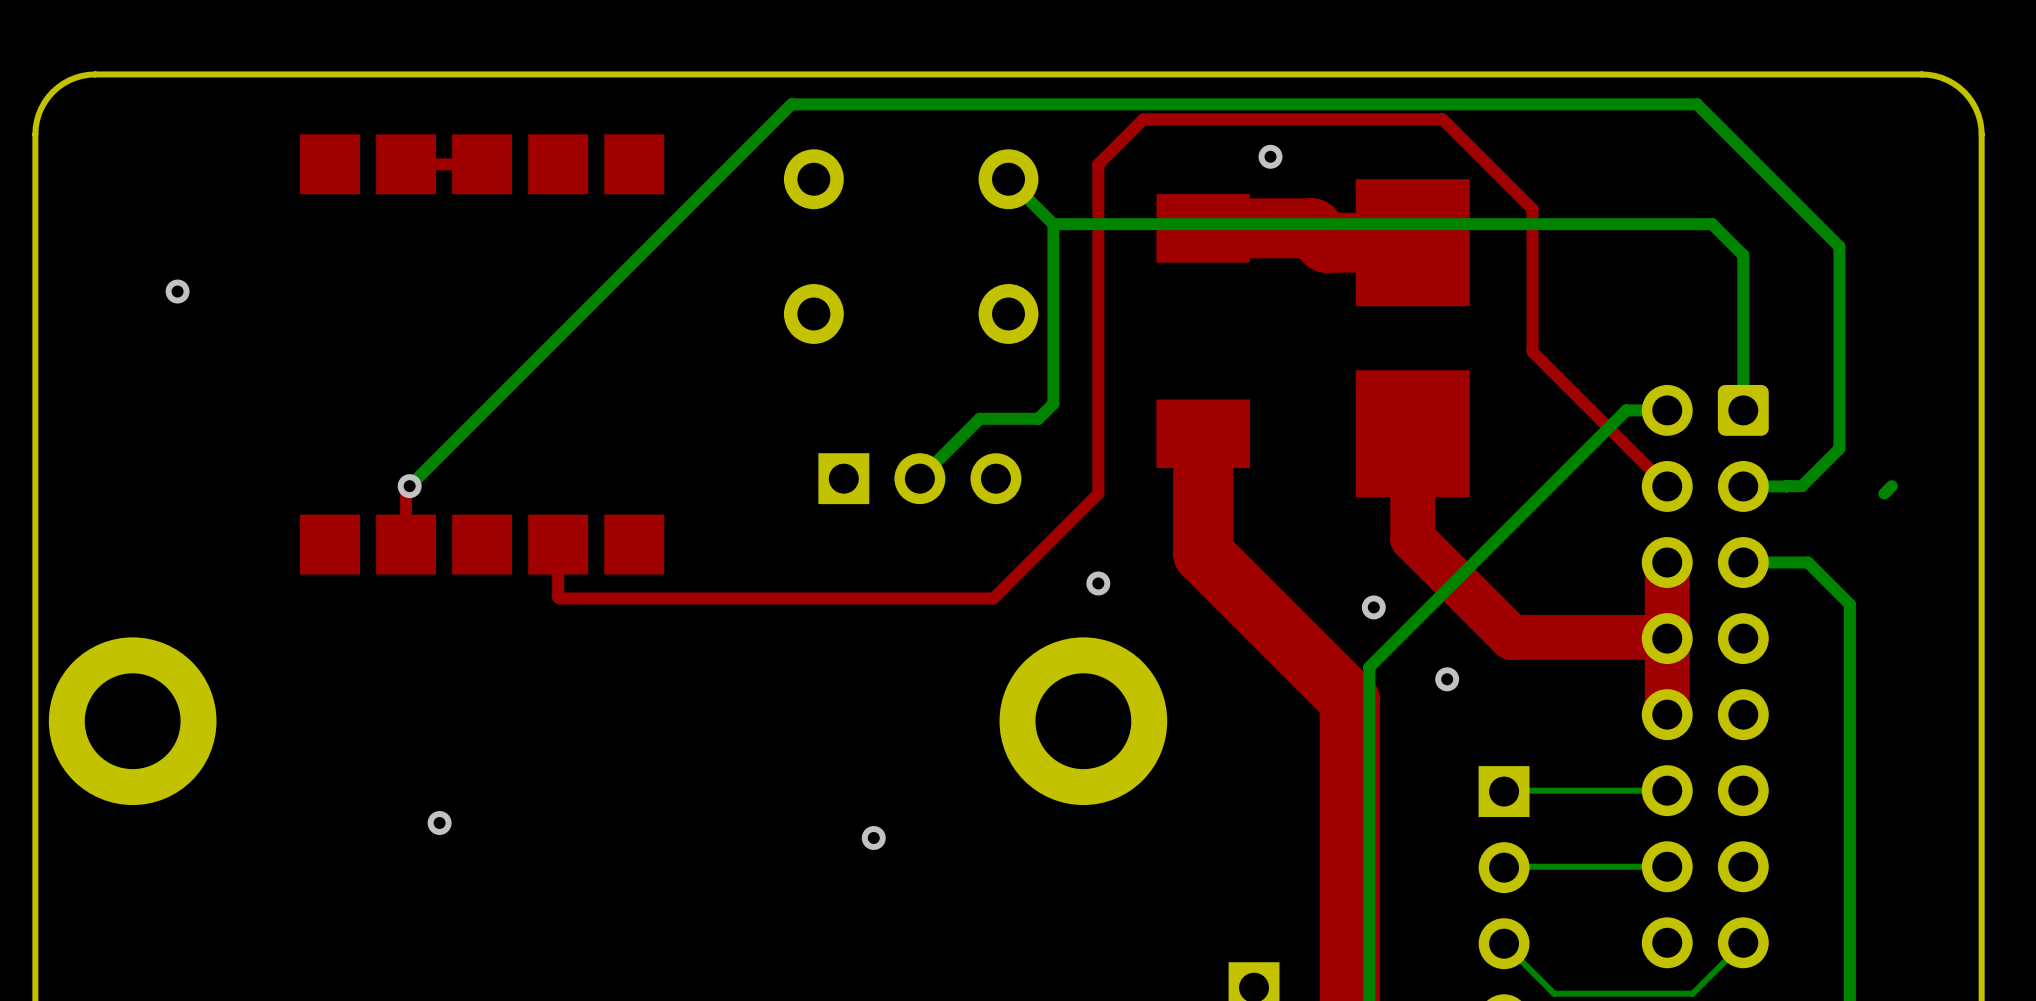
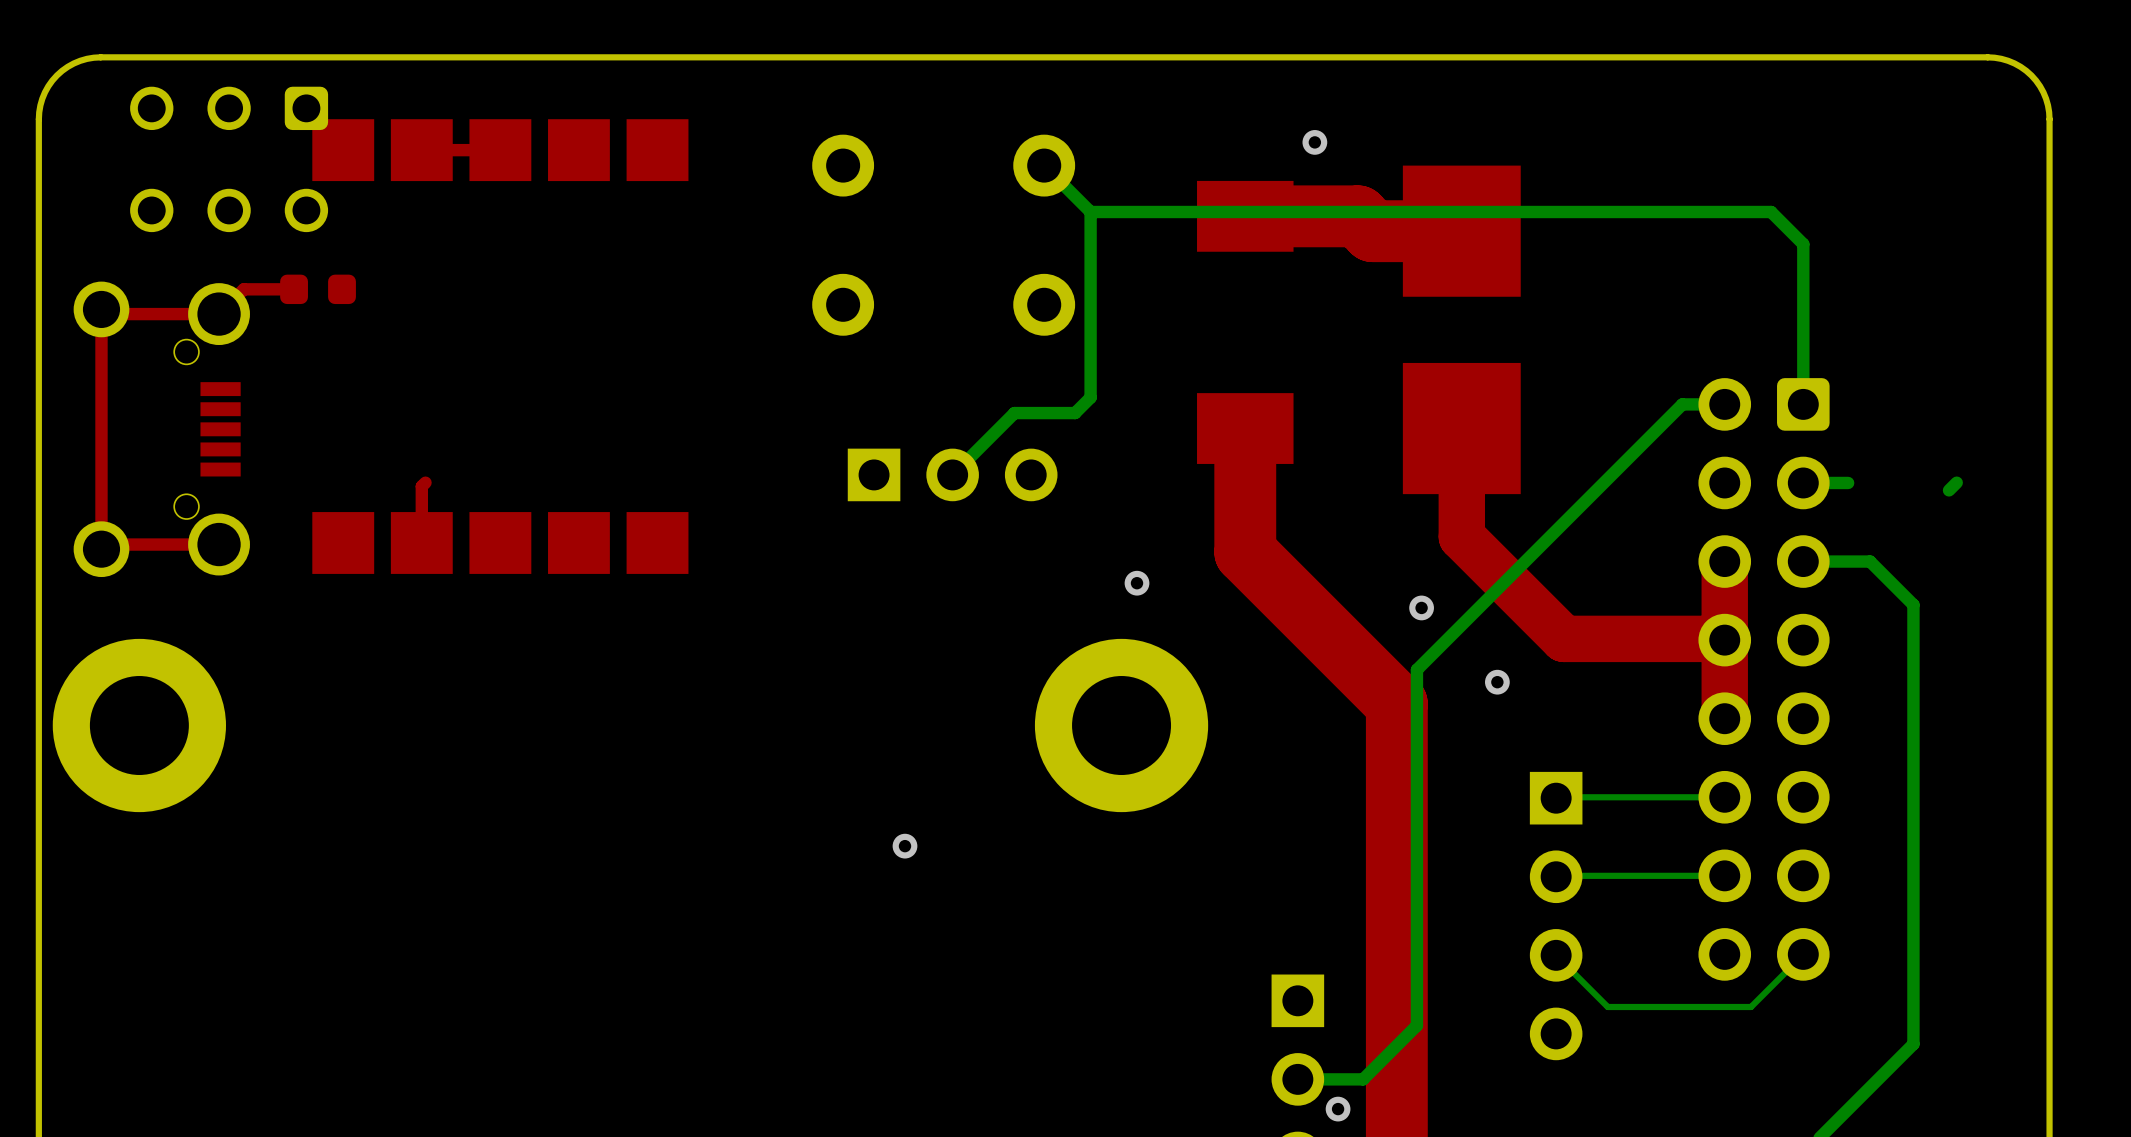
part: none -> (229, 159)
via: (177, 291) -> none
top track: none -> (294, 289) (243, 289) (219, 314)
part: none -> (318, 289)
top track: none -> (219, 314) (106, 314) (101, 309) (101, 549) (106, 544) (219, 544)
part: none -> (161, 429)
via: (409, 486) -> none
top track: (1667, 486) (1532, 351) (1532, 209) (1442, 119) (1143, 119) (1098, 164) (1098, 493) (993, 598) (559, 598) (558, 544) -> none
bottom track: (1787, 486) (1802, 486) (1839, 448) (1839, 246) (1697, 104) (791, 104) (409, 486) -> none
via: (439, 823) -> none

